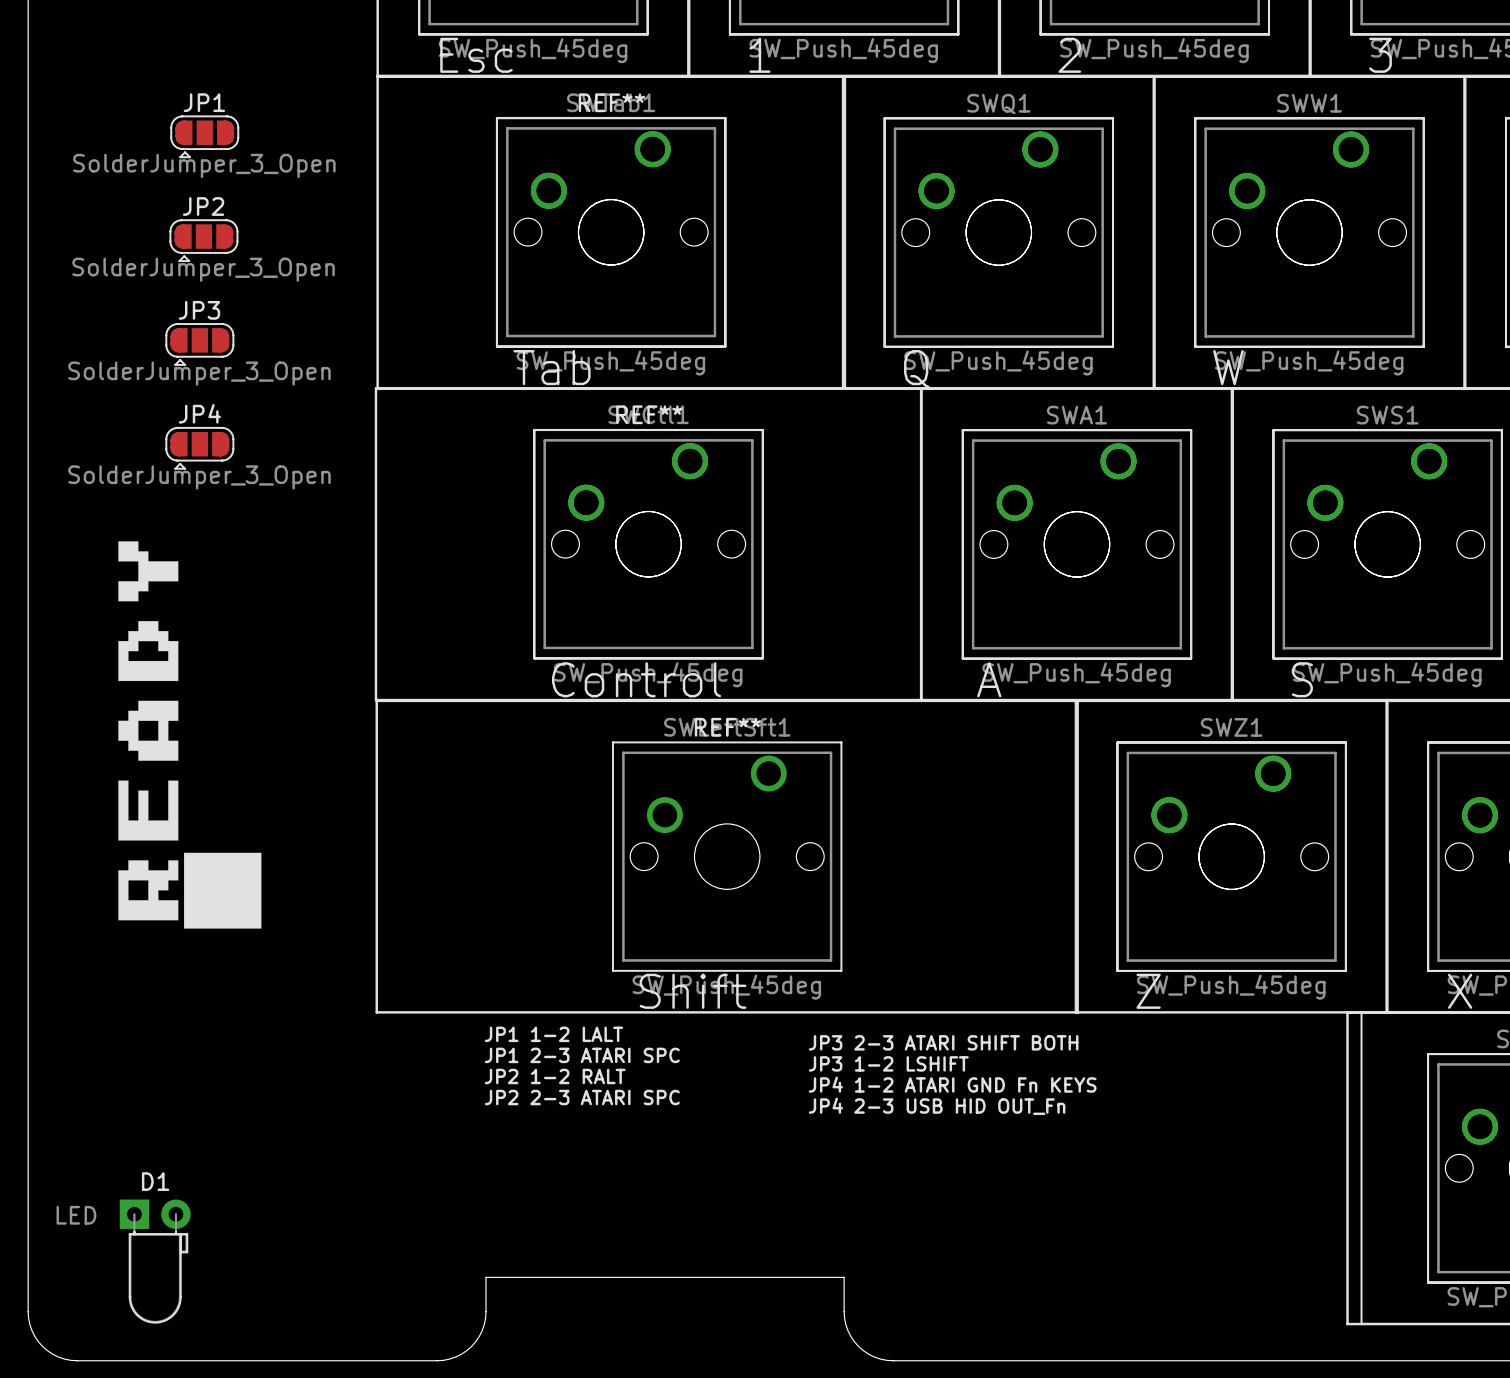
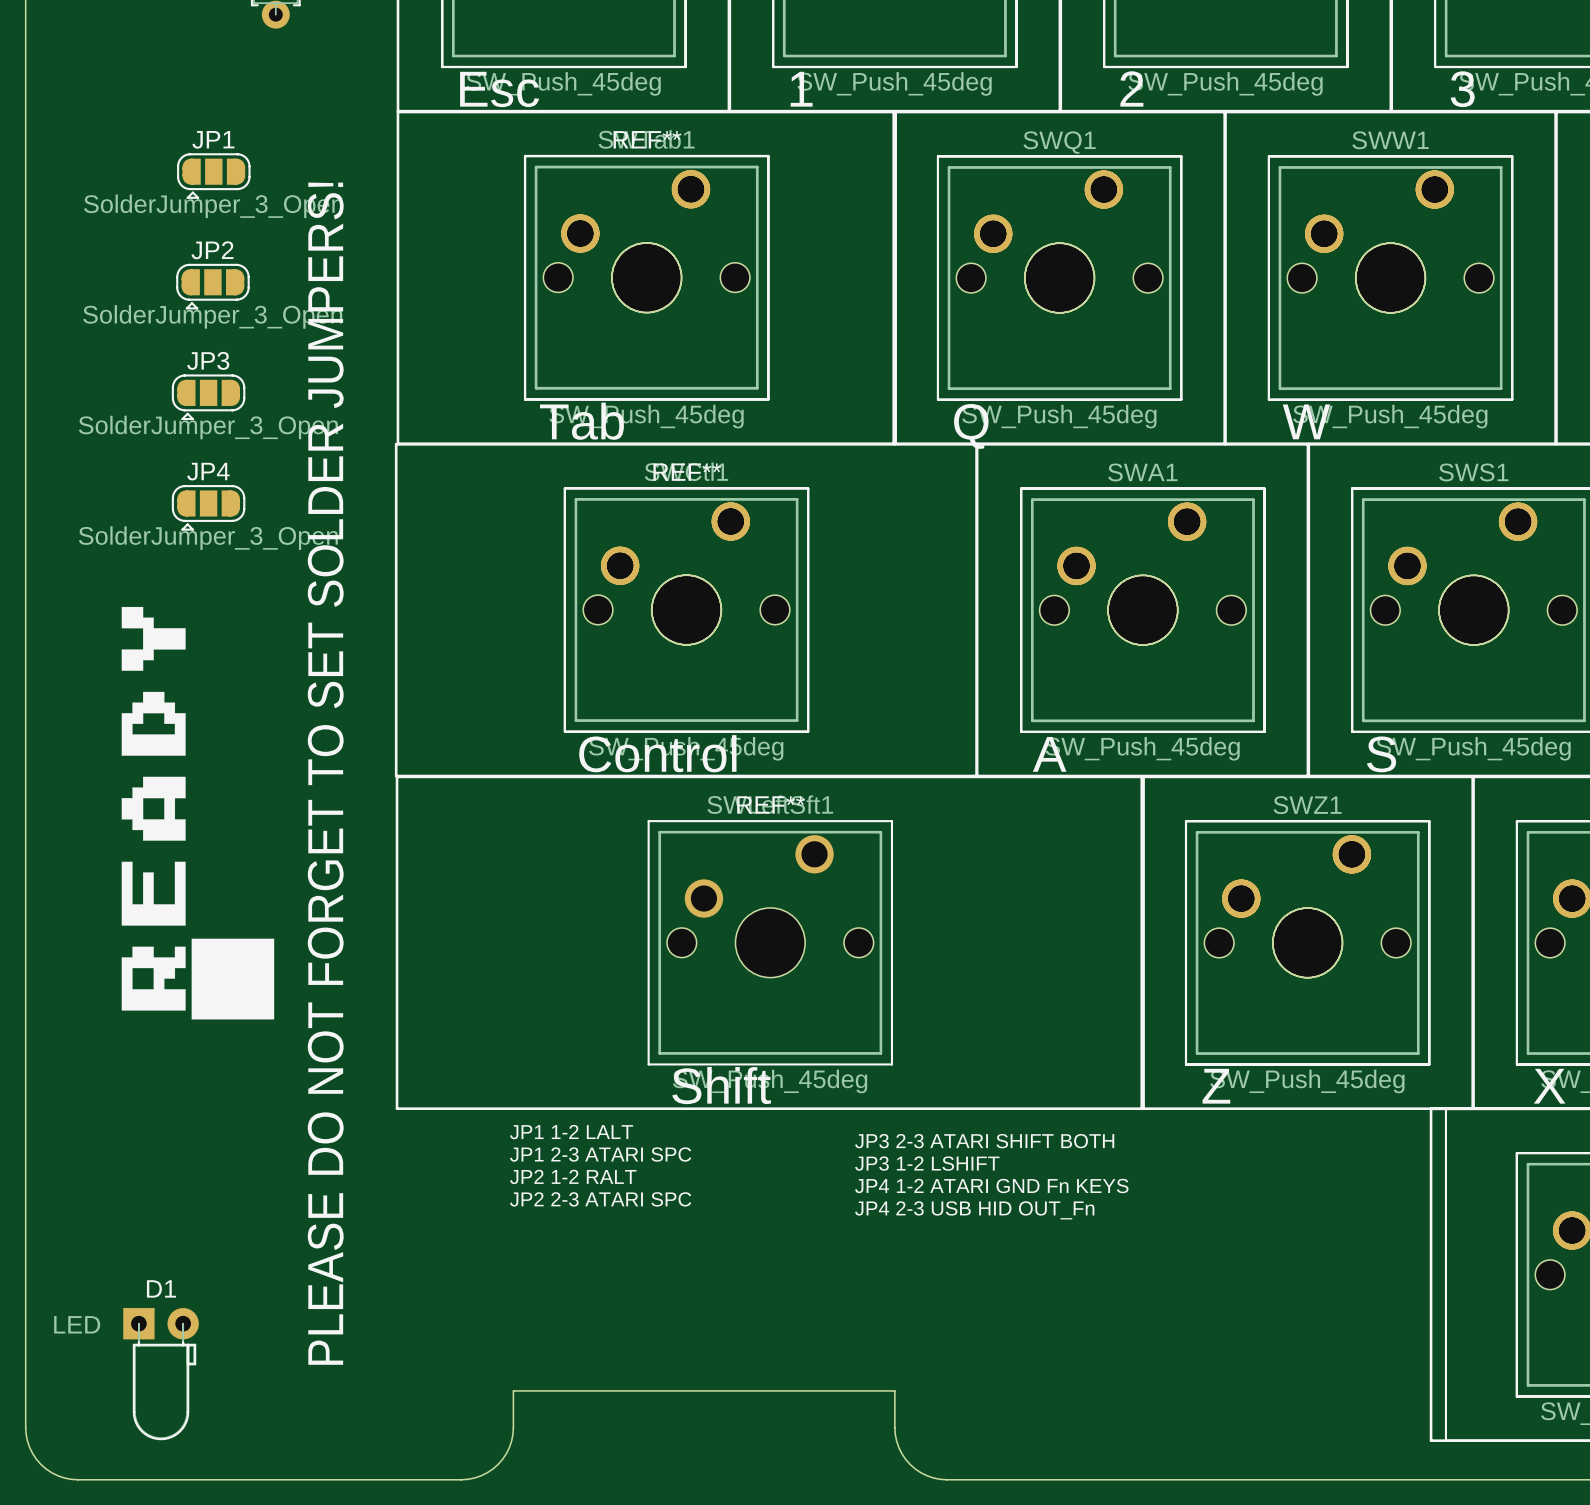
text: none -> PLEASE DO NOT FORGET TO SET SOLDER JUMPERS! (325, 773)

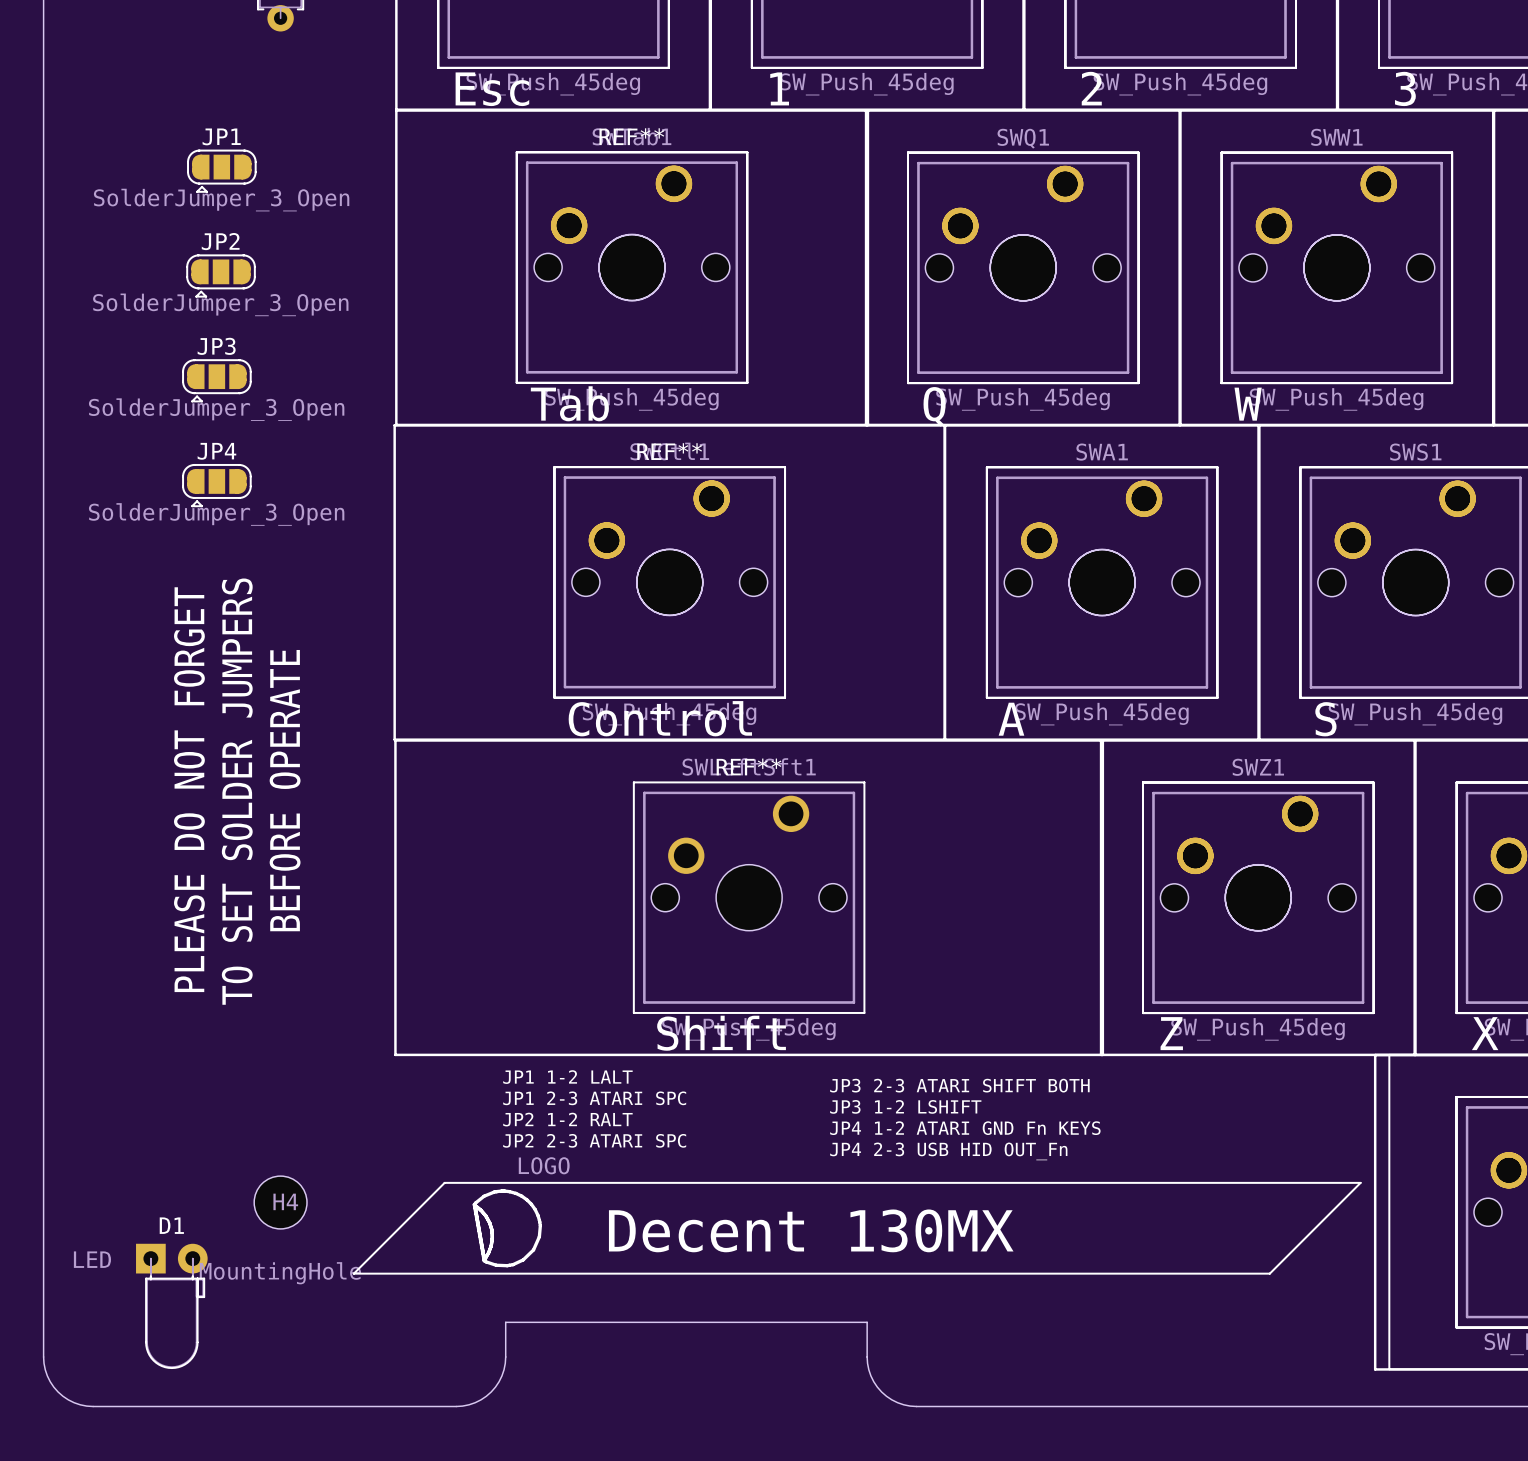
drawing: [121, 606, 275, 1020] -> none
text: PLEASE DO NOT FORGET TO SET SOLDER JUMPERS! (325, 773) -> none
text: none -> PLEASE DO NOT FORGET (189, 789)
text: none -> BEFORE OPERATE (285, 790)
text: none -> TO SET SOLDER JUMPERS (237, 791)
drawing: none -> [352, 1181, 1362, 1275]
H4: none -> MountingHole (280, 1202)

